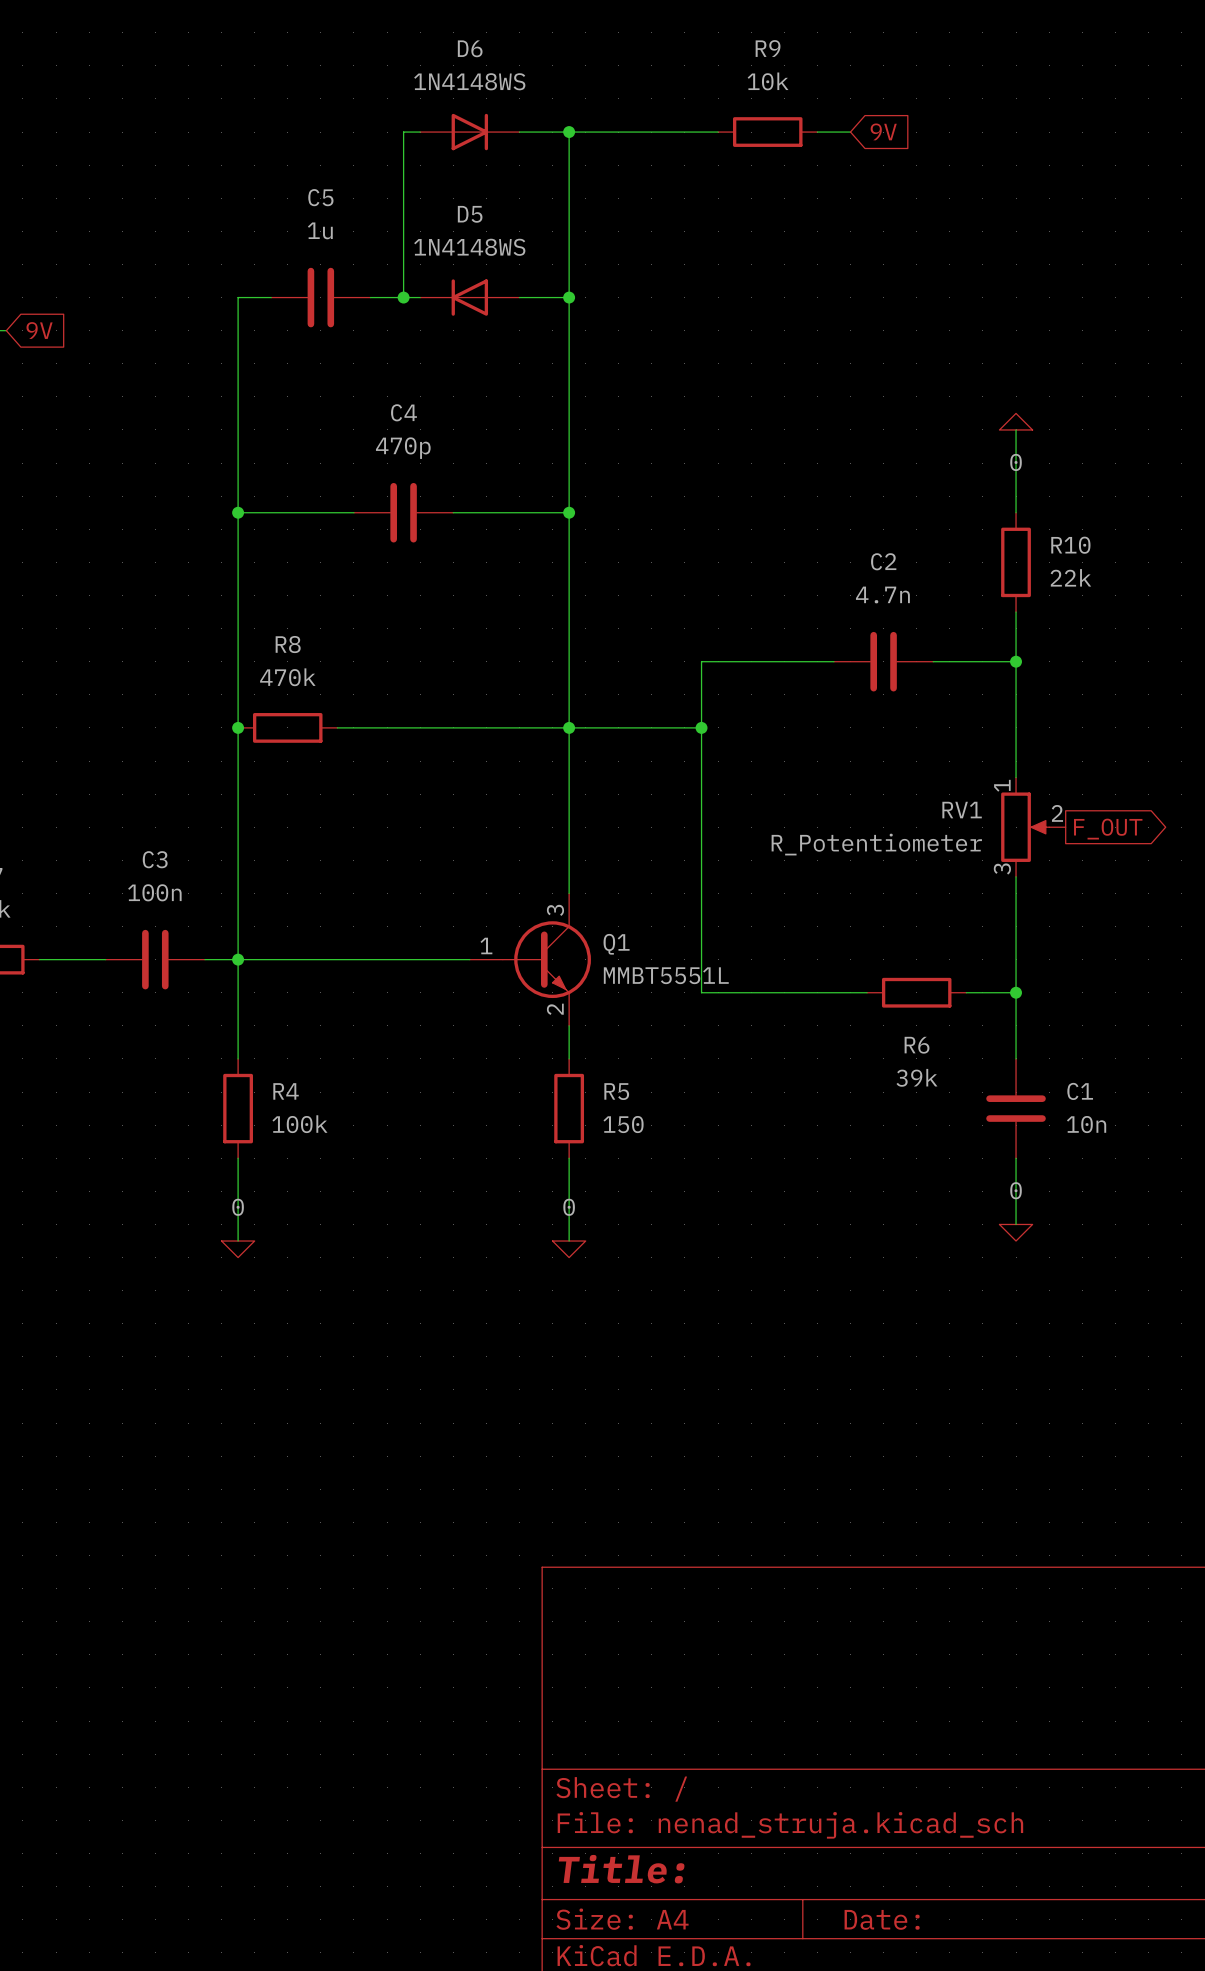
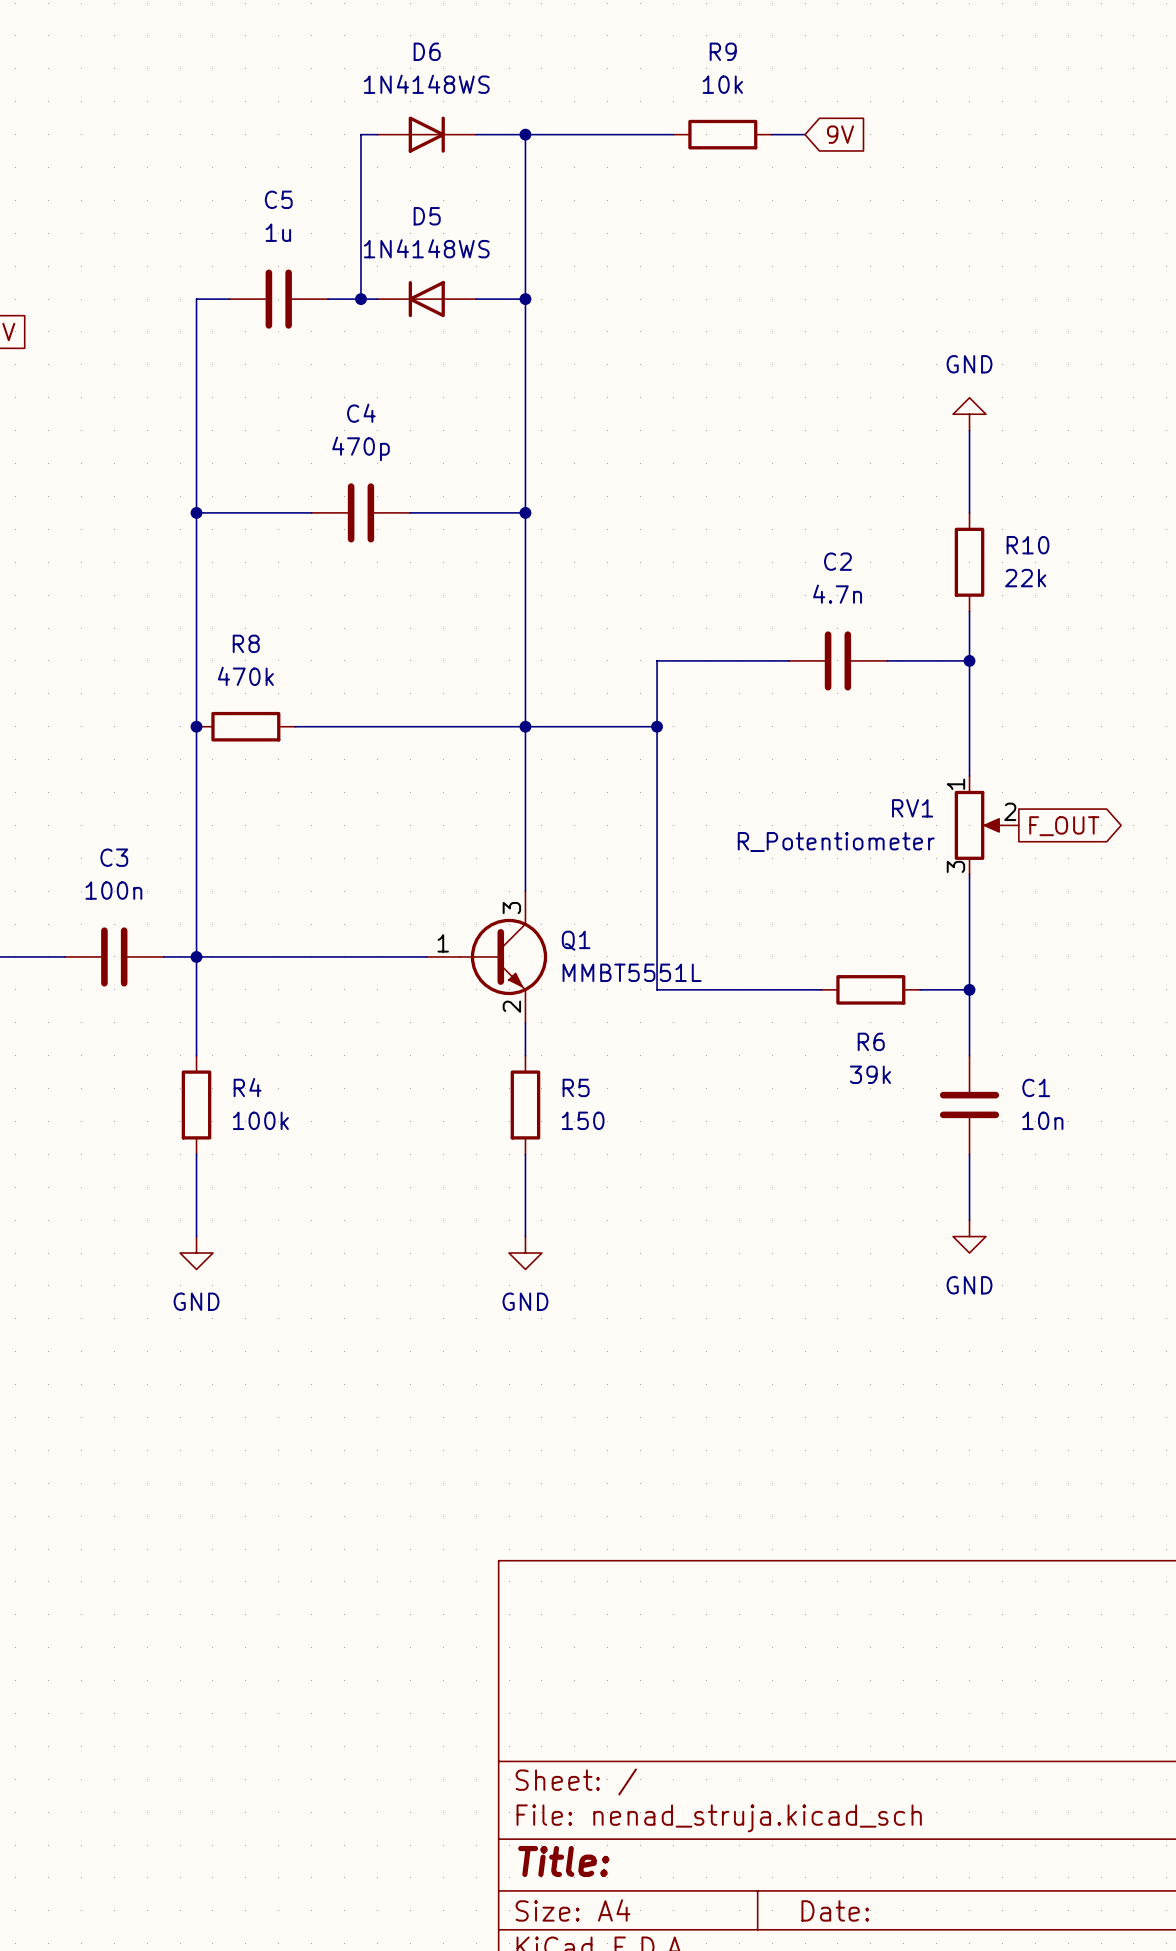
power symbol: 0 (1016, 421) -> GND (969, 414)
power symbol: 0 (1016, 1232) -> GND (969, 1236)
power symbol: 0 (238, 1249) -> GND (196, 1253)
power symbol: 0 (569, 1249) -> GND (525, 1253)

